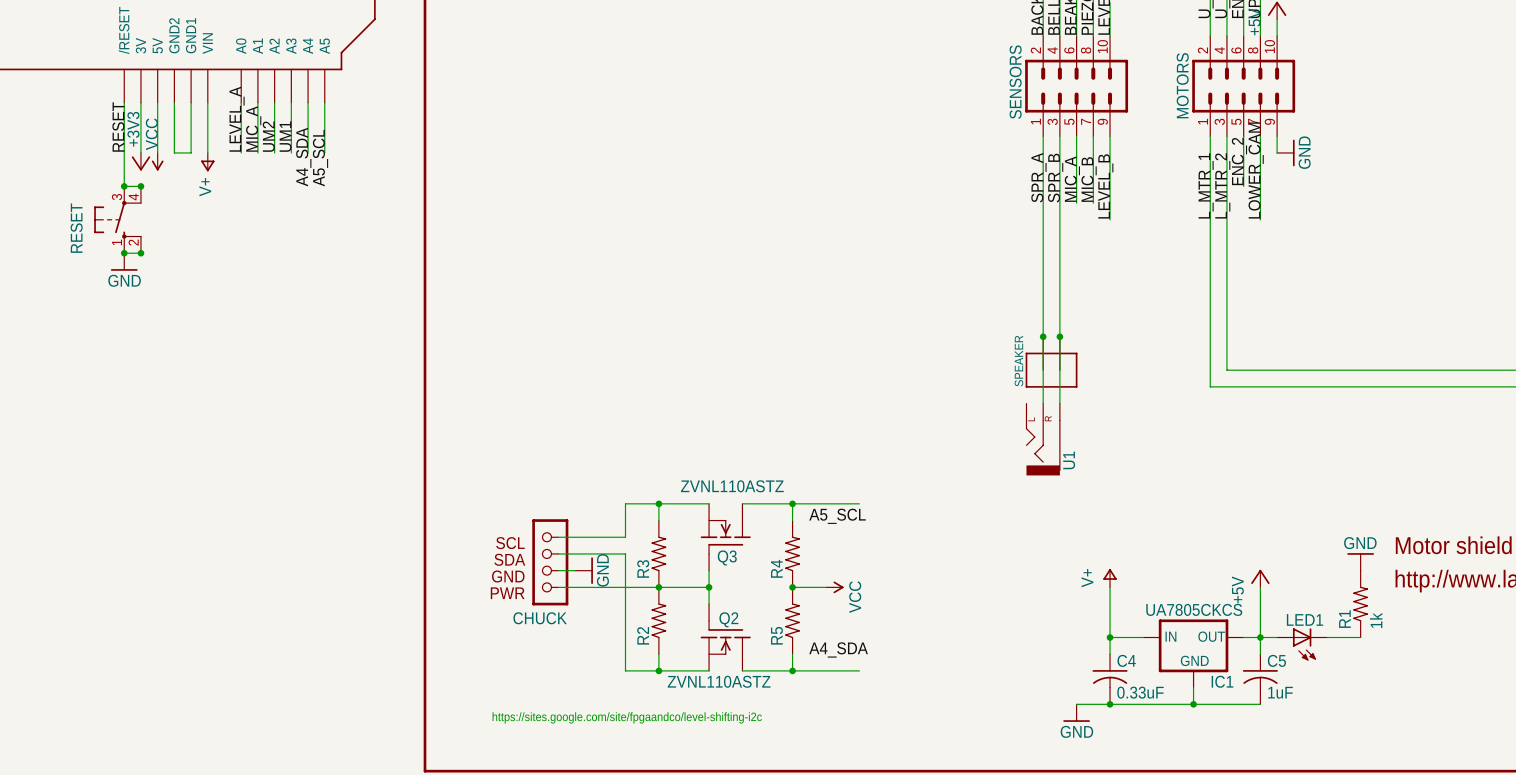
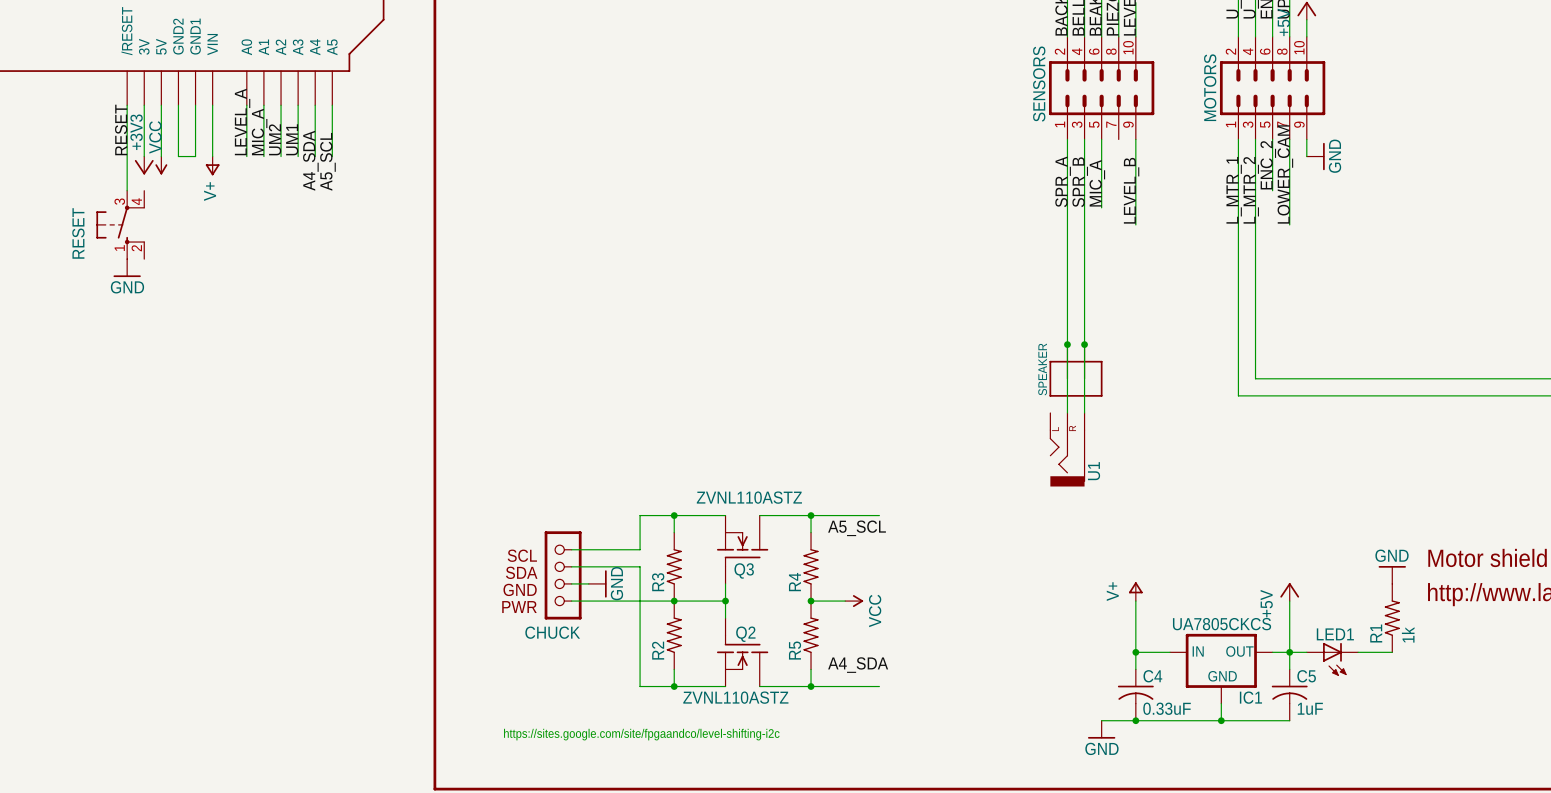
wire: (1093, 136) (1093, 203) -> none
label: MIC_B (1089, 179) -> none
wire: (124, 186) (140, 186) -> none
junction: (124, 186) -> none
junction: (140, 186) -> none
wire: (124, 253) (140, 253) -> none
junction: (124, 253) -> none
junction: (140, 253) -> none

